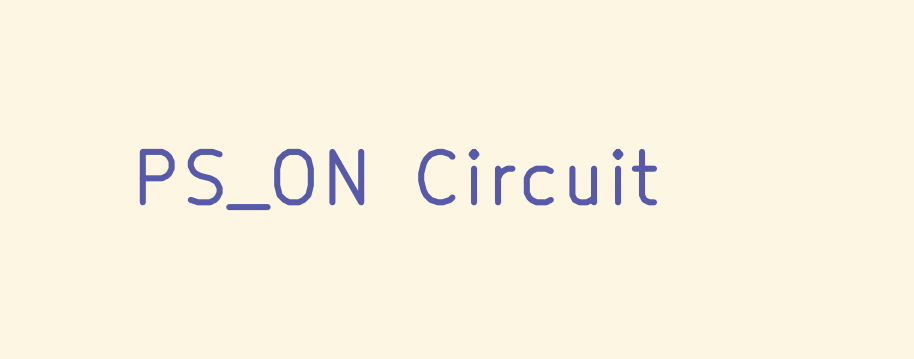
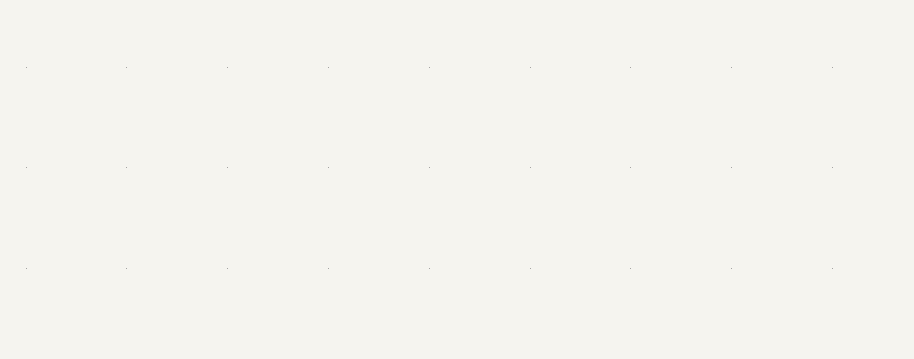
text: PS_ON Circuit (398, 179) -> none

